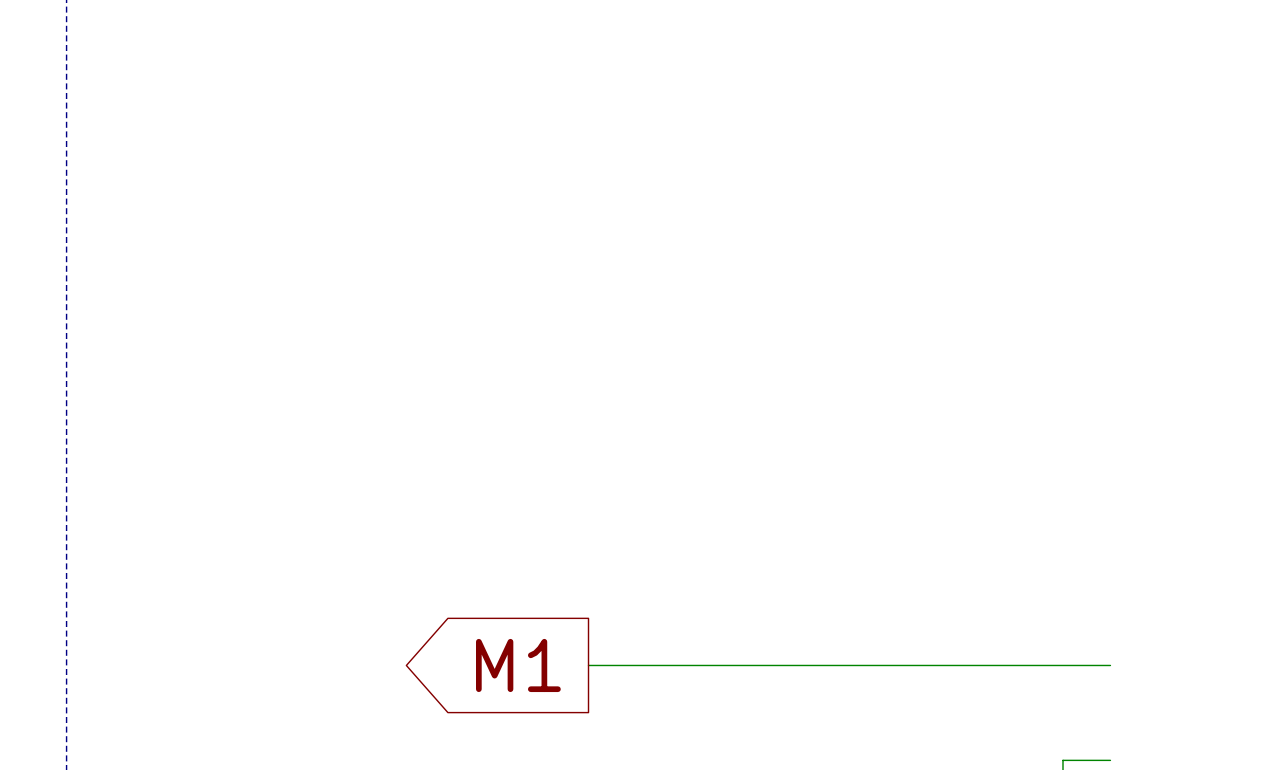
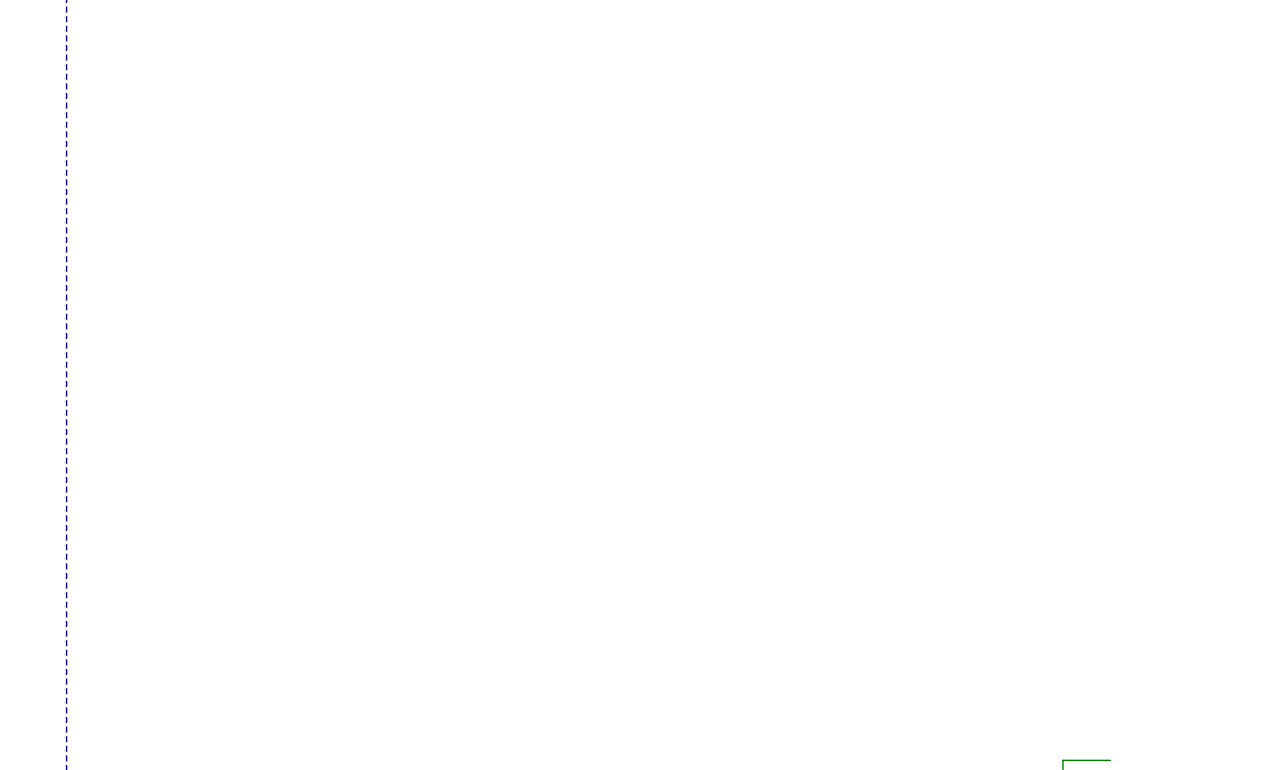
global label: M1 (518, 665) -> none
wire: (588, 665) (1110, 665) -> none

